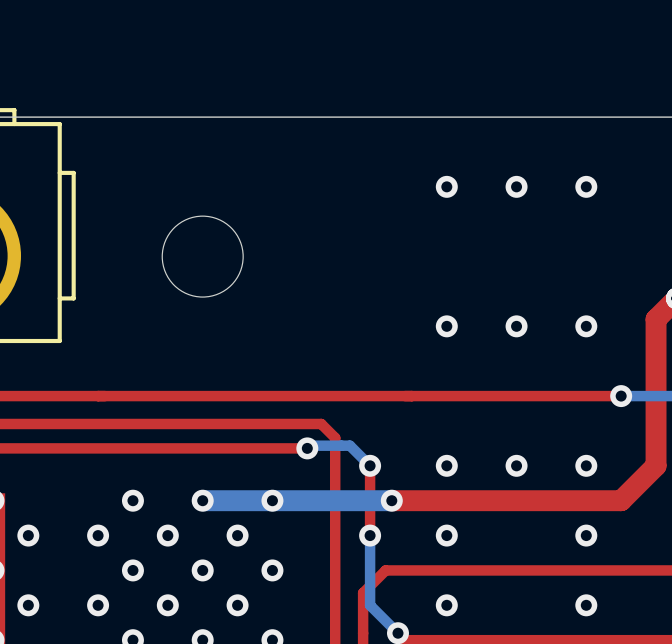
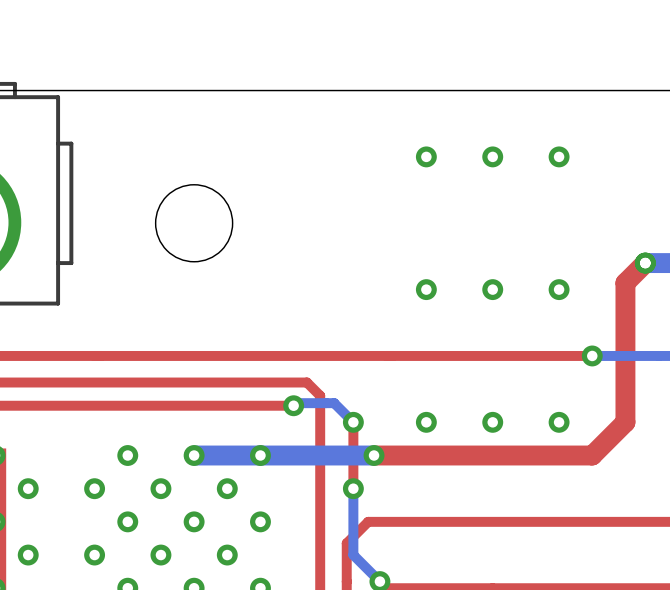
via: (446, 535) -> none
via: (586, 535) -> none
via: (446, 605) -> none
via: (586, 605) -> none

